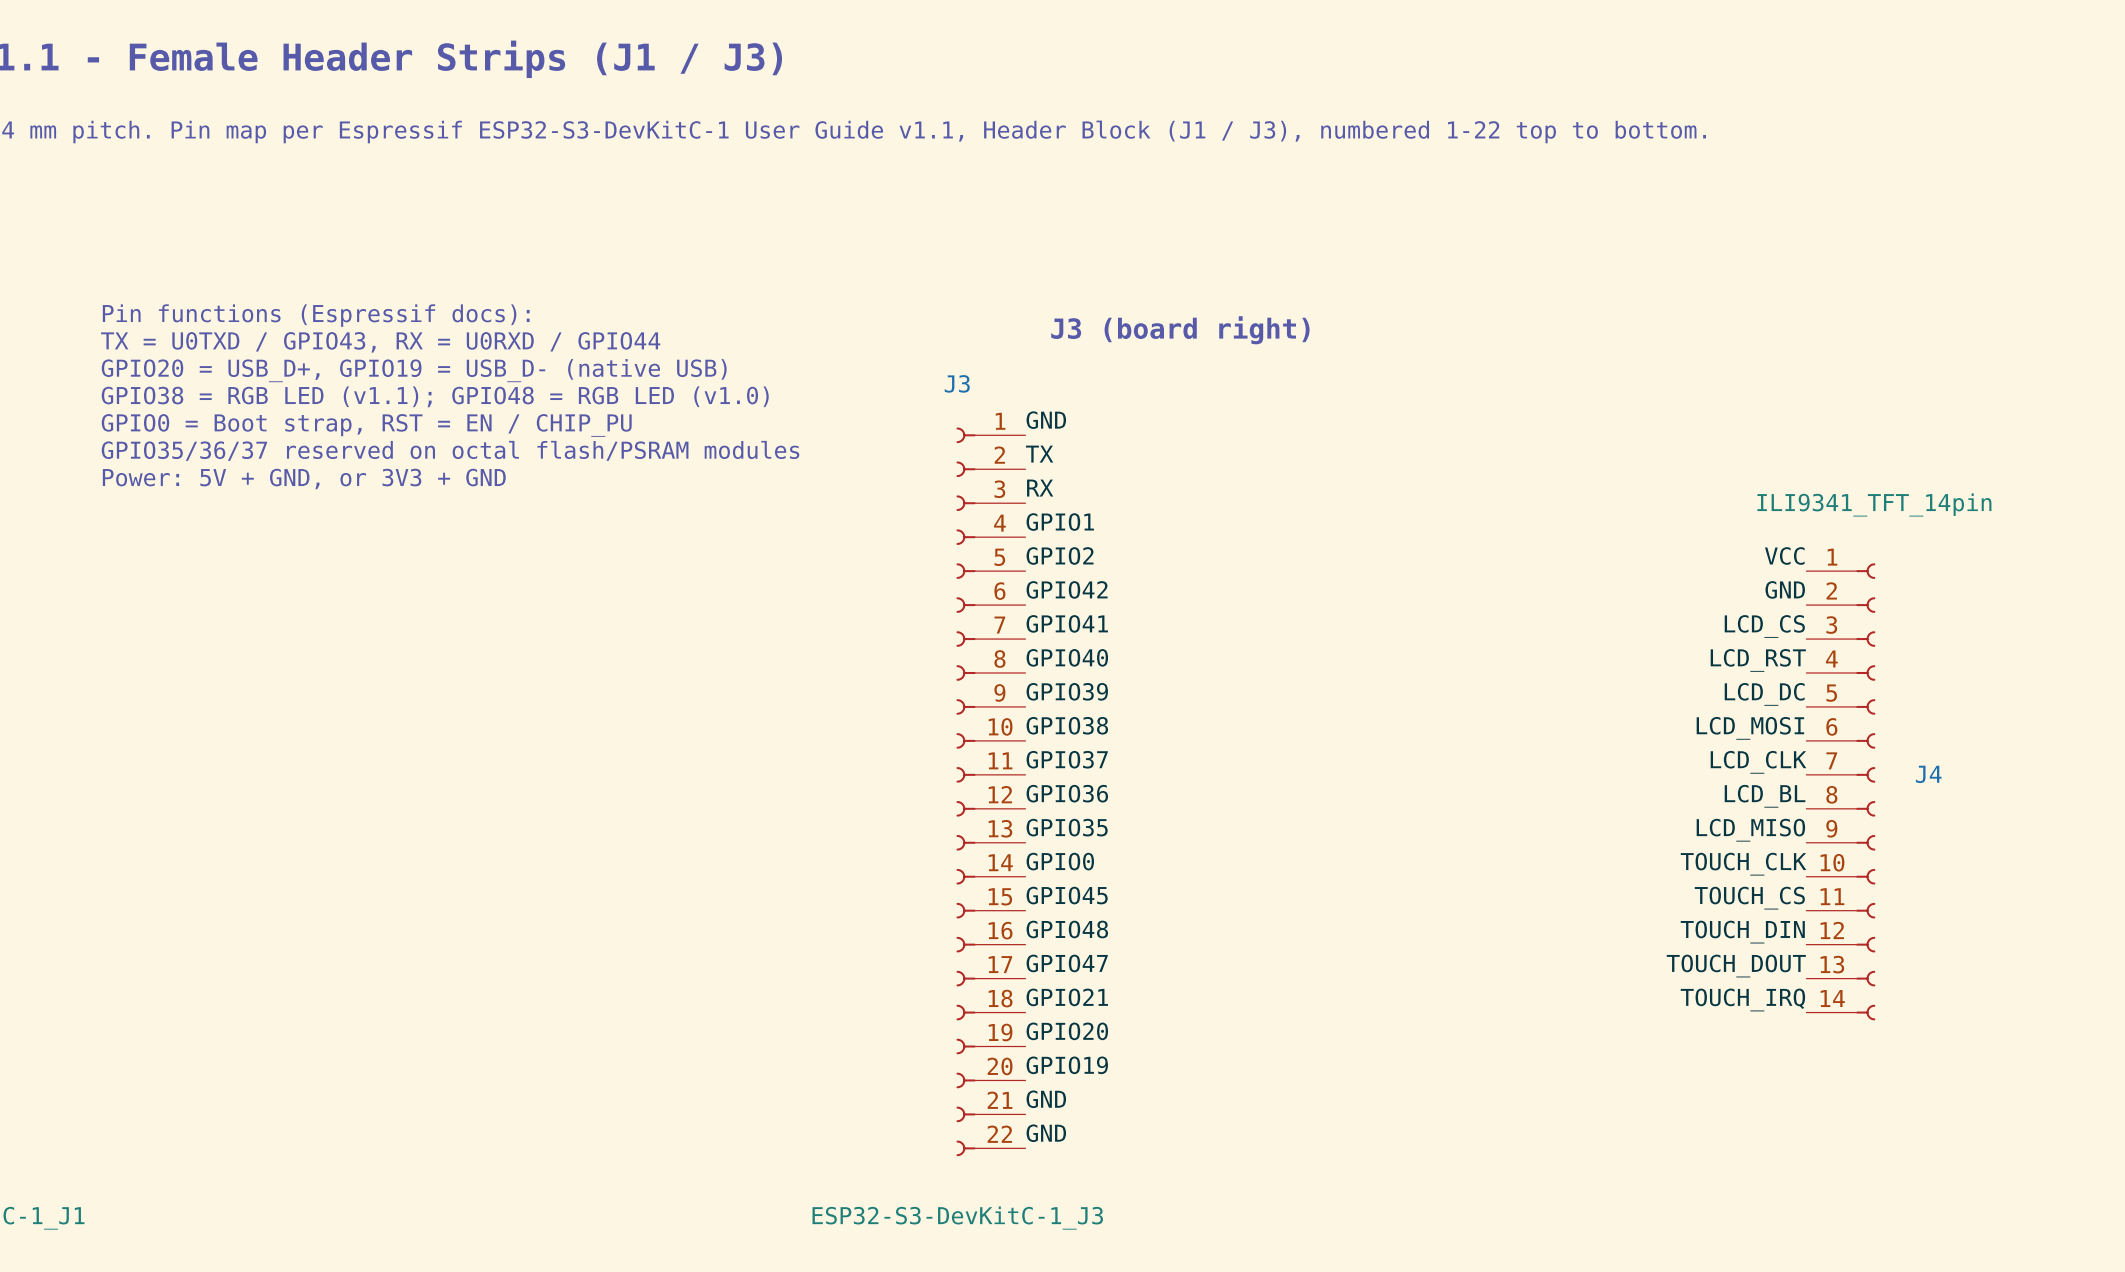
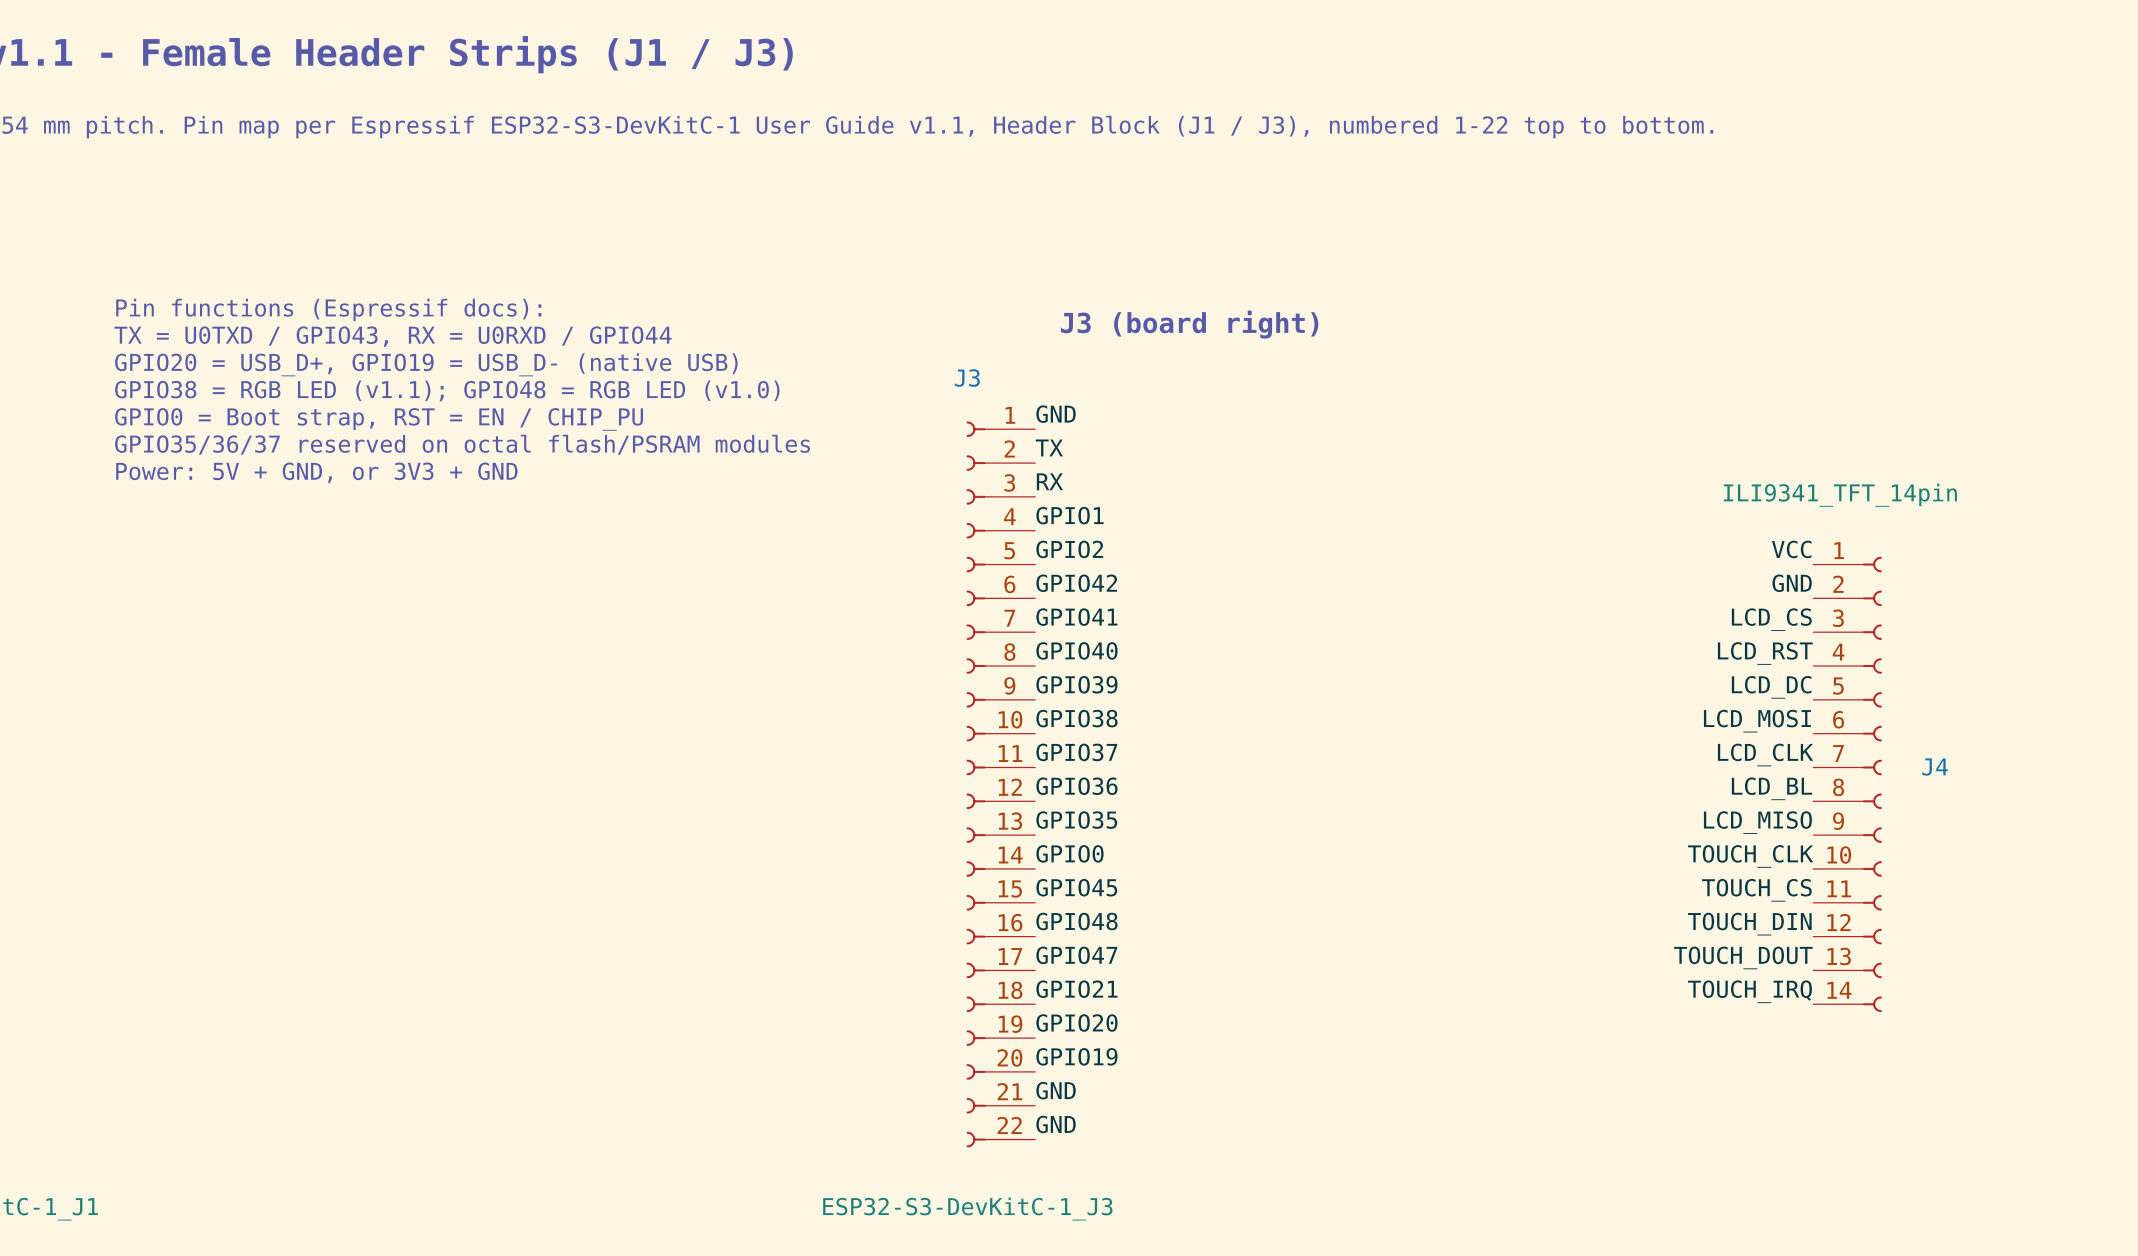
J4 value position: ILI9341_TFT_14pin (1874, 504) -> ILI9341_TFT_14pin (1840, 495)

